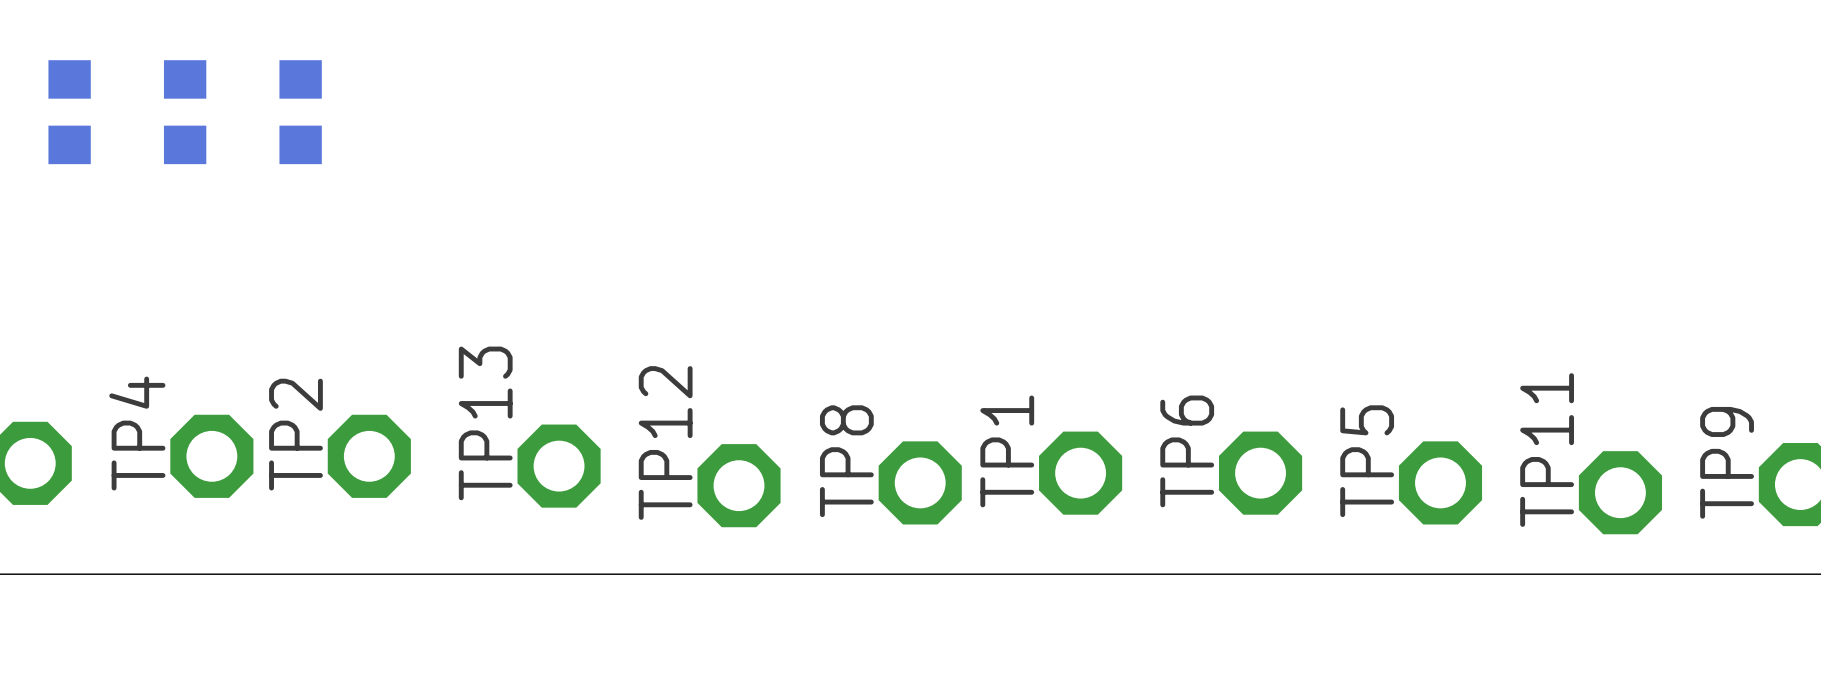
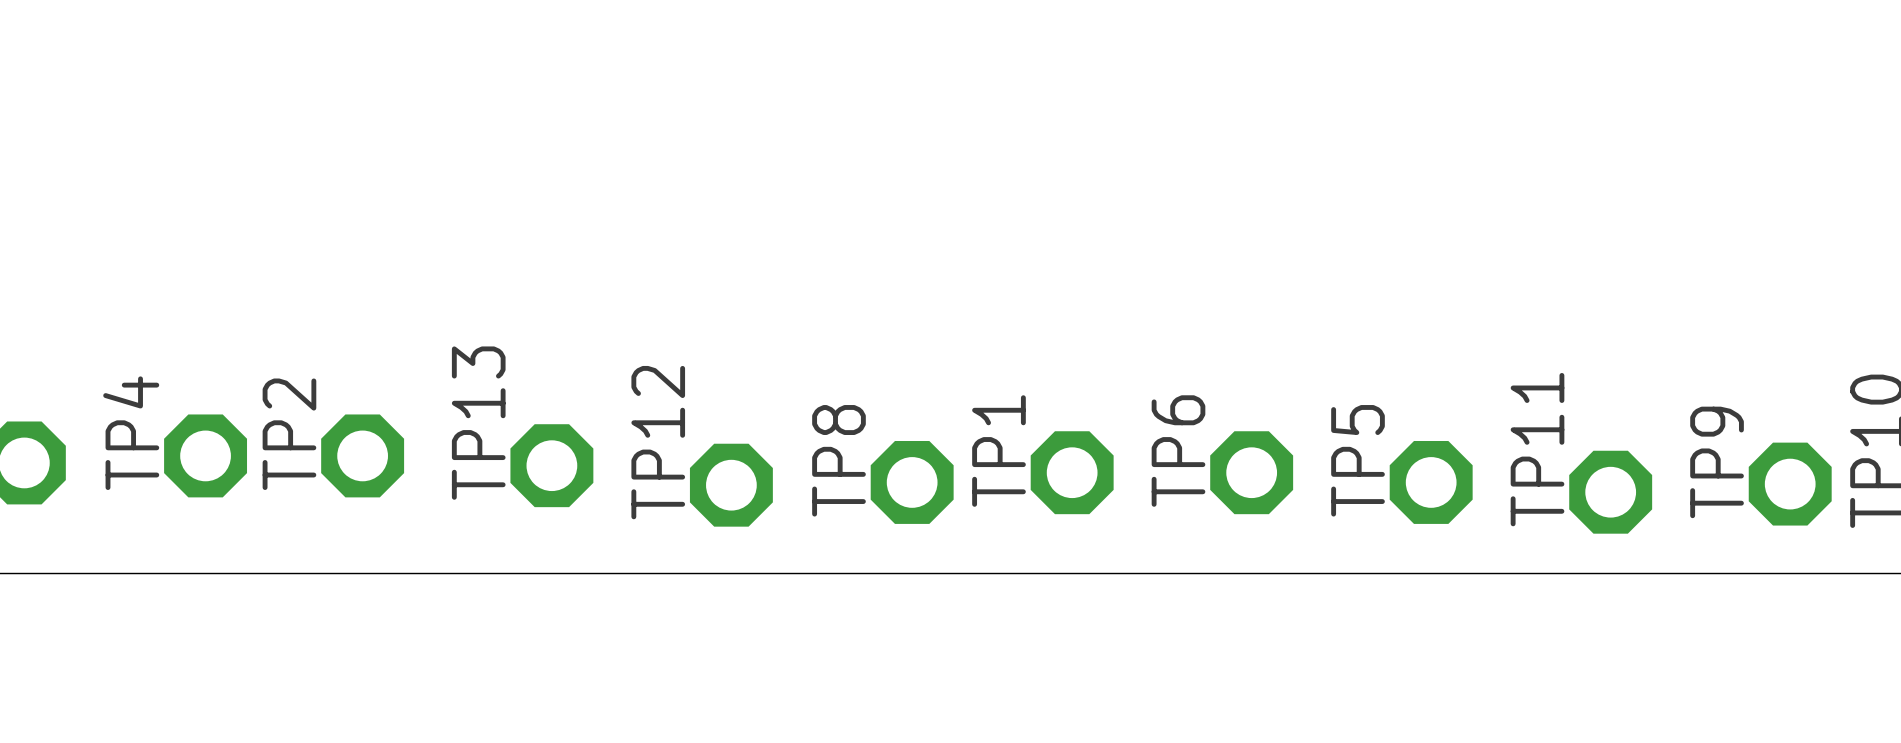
part: (69, 112) -> none
part: (185, 112) -> none
part: (300, 112) -> none

